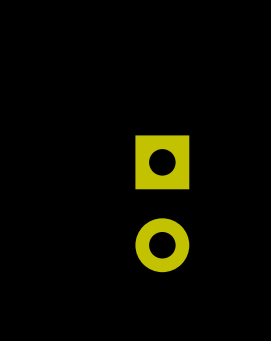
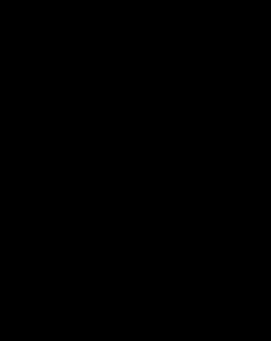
part: (162, 203) -> none

